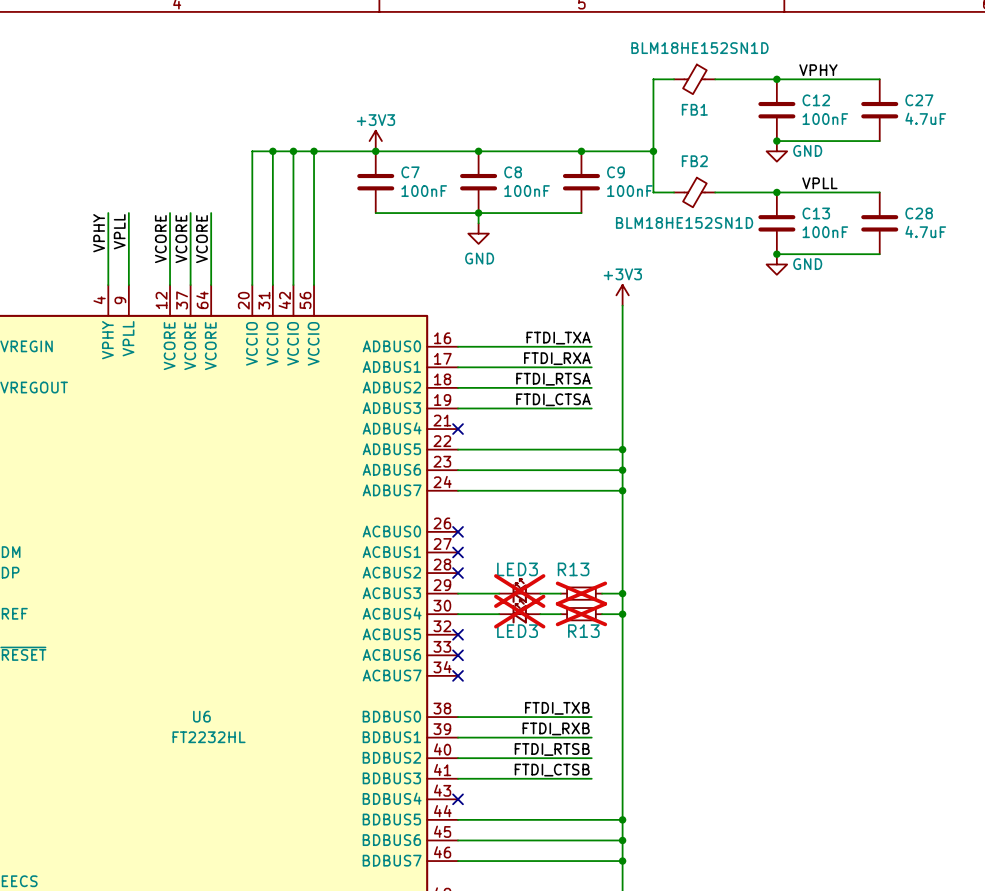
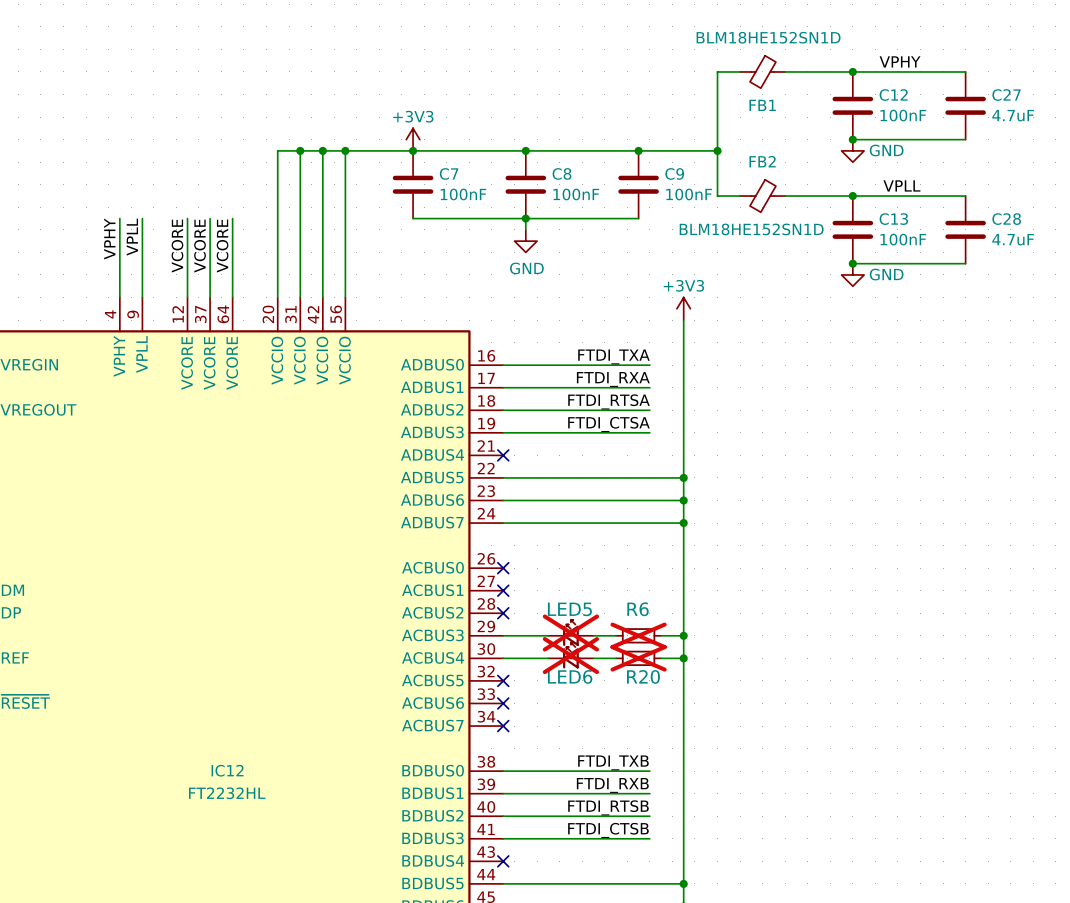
LED3 name: LED3 (517, 569) -> LED5 (569, 609)
R13 name: R13 (573, 569) -> R6 (638, 609)
LED3 name: LED3 (517, 631) -> LED6 (570, 676)
R13 name: R13 (583, 631) -> R20 (643, 676)
U6 name: U6 (201, 716) -> IC12 (227, 770)

